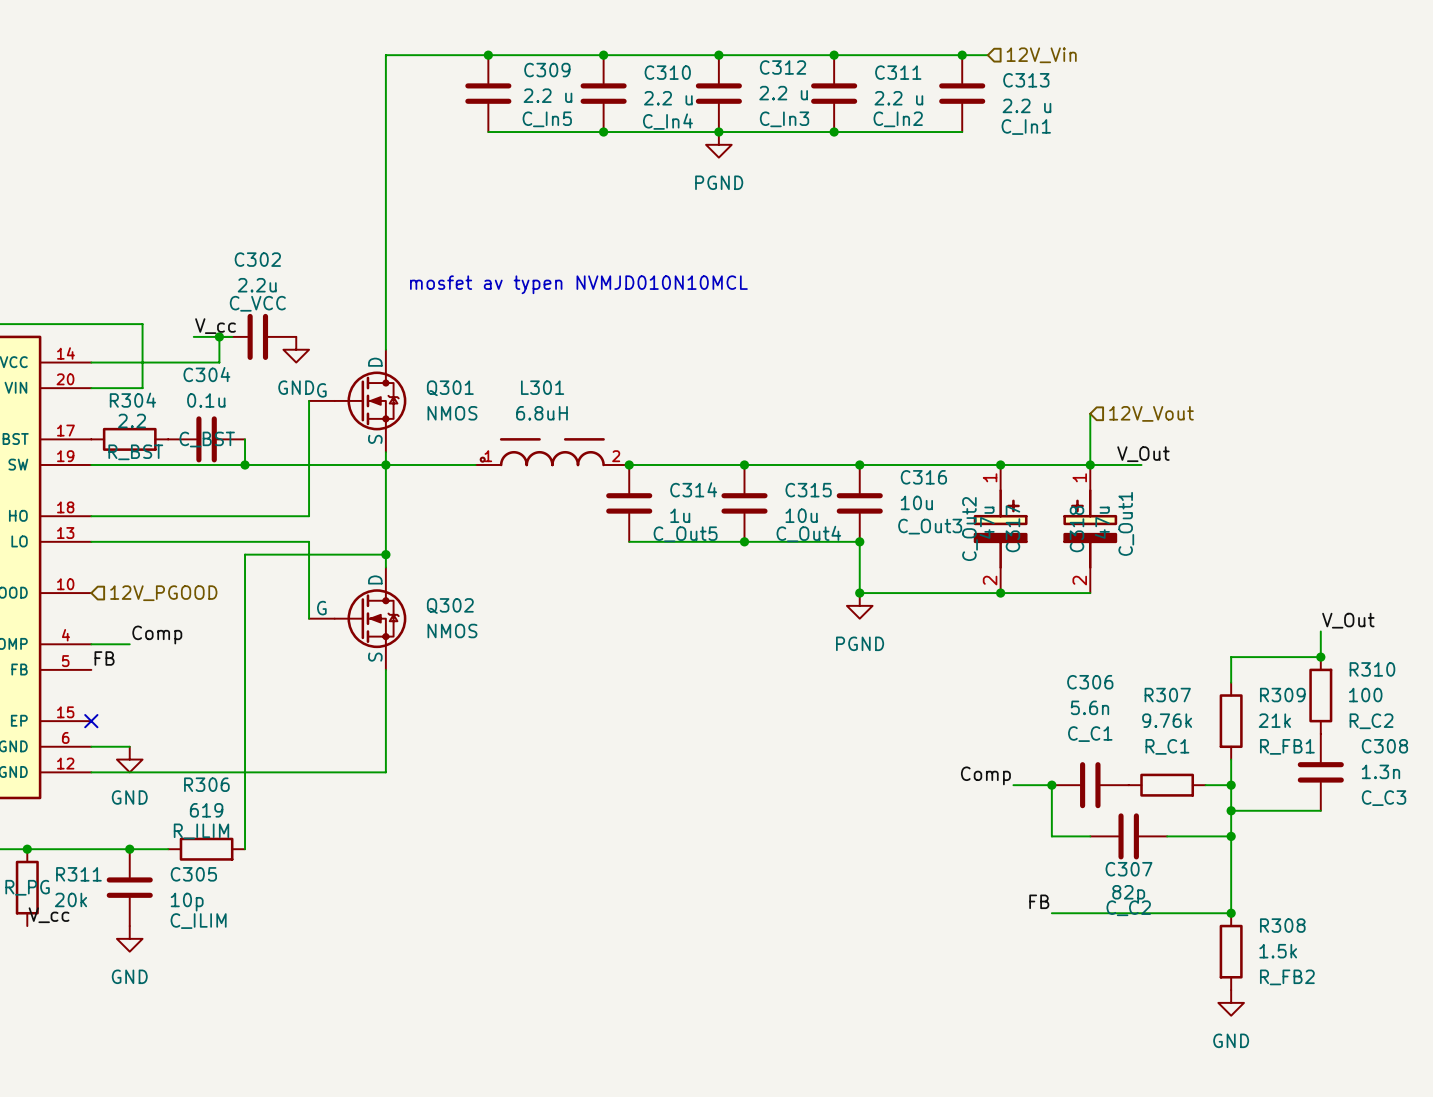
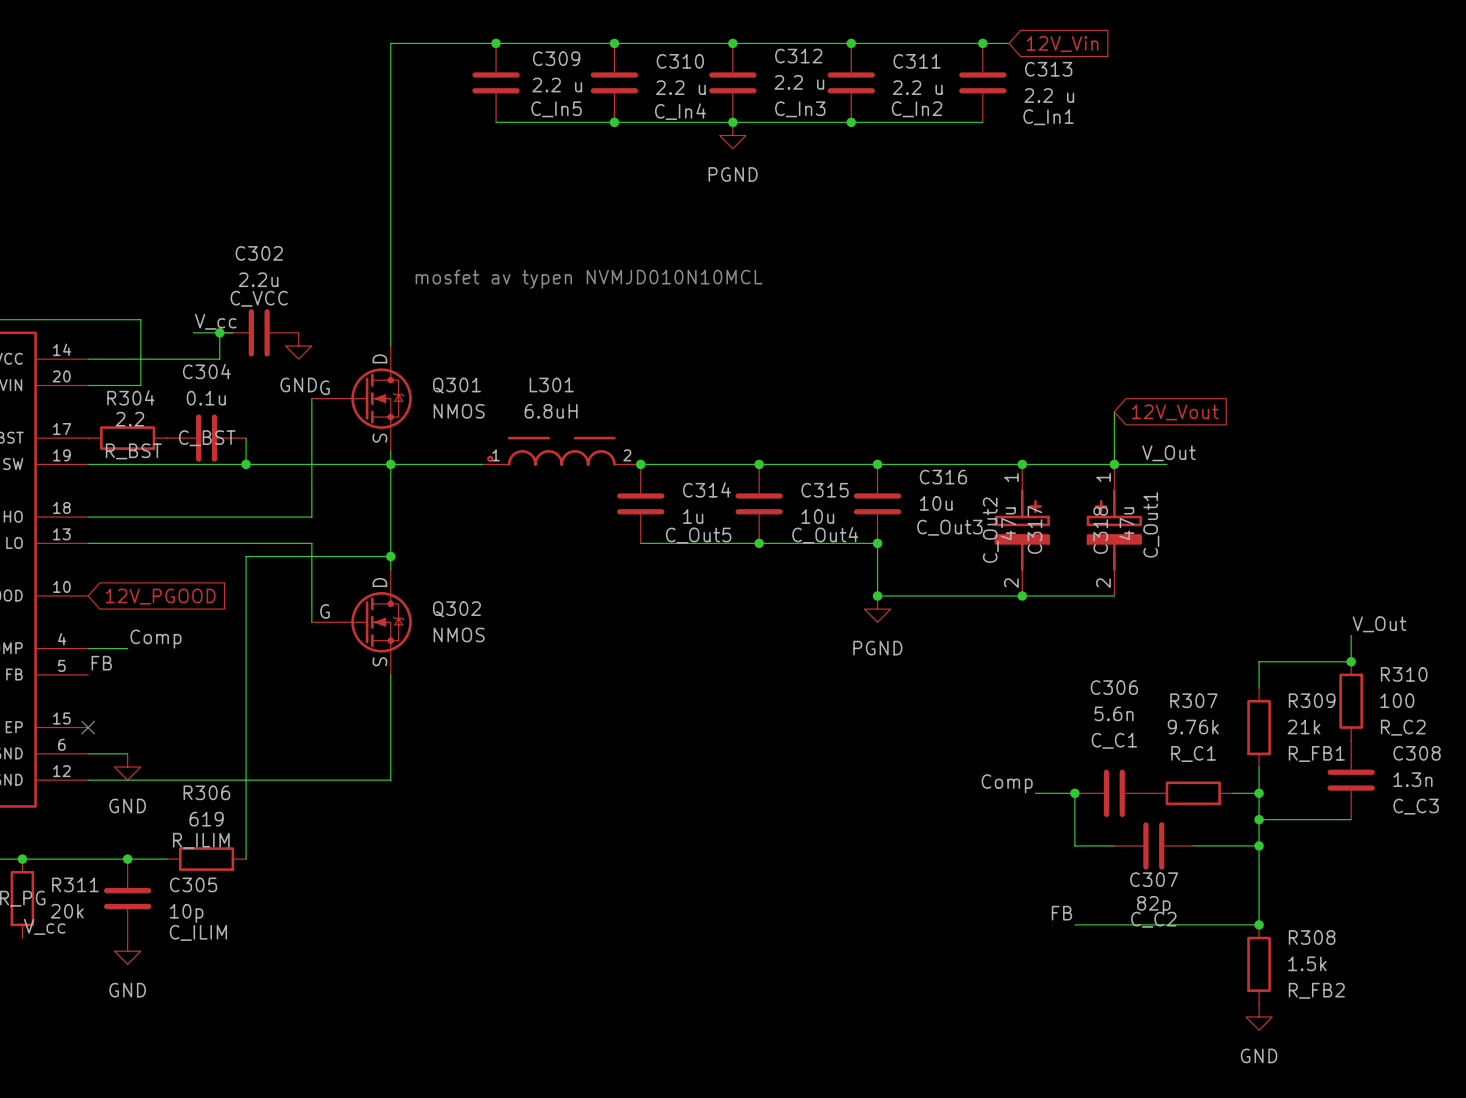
global label: none -> 12V_Vin (1062, 44)
hierarchical label: 12V_Vin (1041, 55) -> none
hierarchical label: 12V_Vout (1151, 413) -> none
global label: none -> 12V_Vout (1175, 412)
global label: none -> 12V_PGOOD (160, 596)
hierarchical label: 12V_PGOOD (163, 593) -> none

